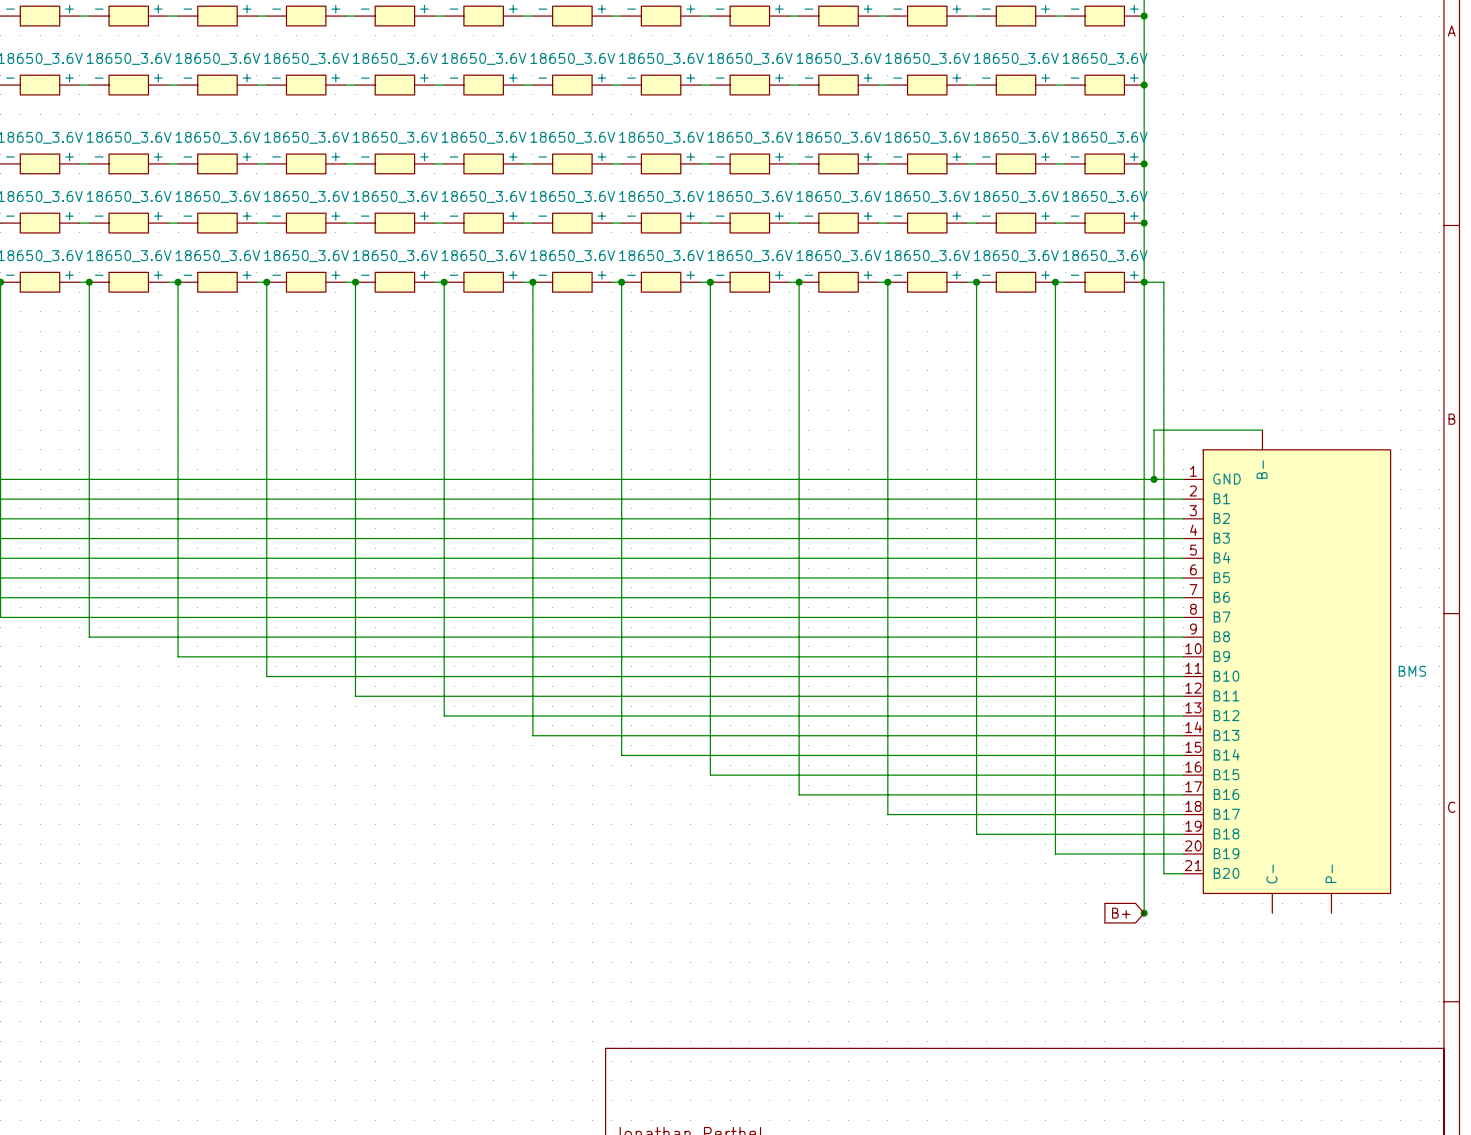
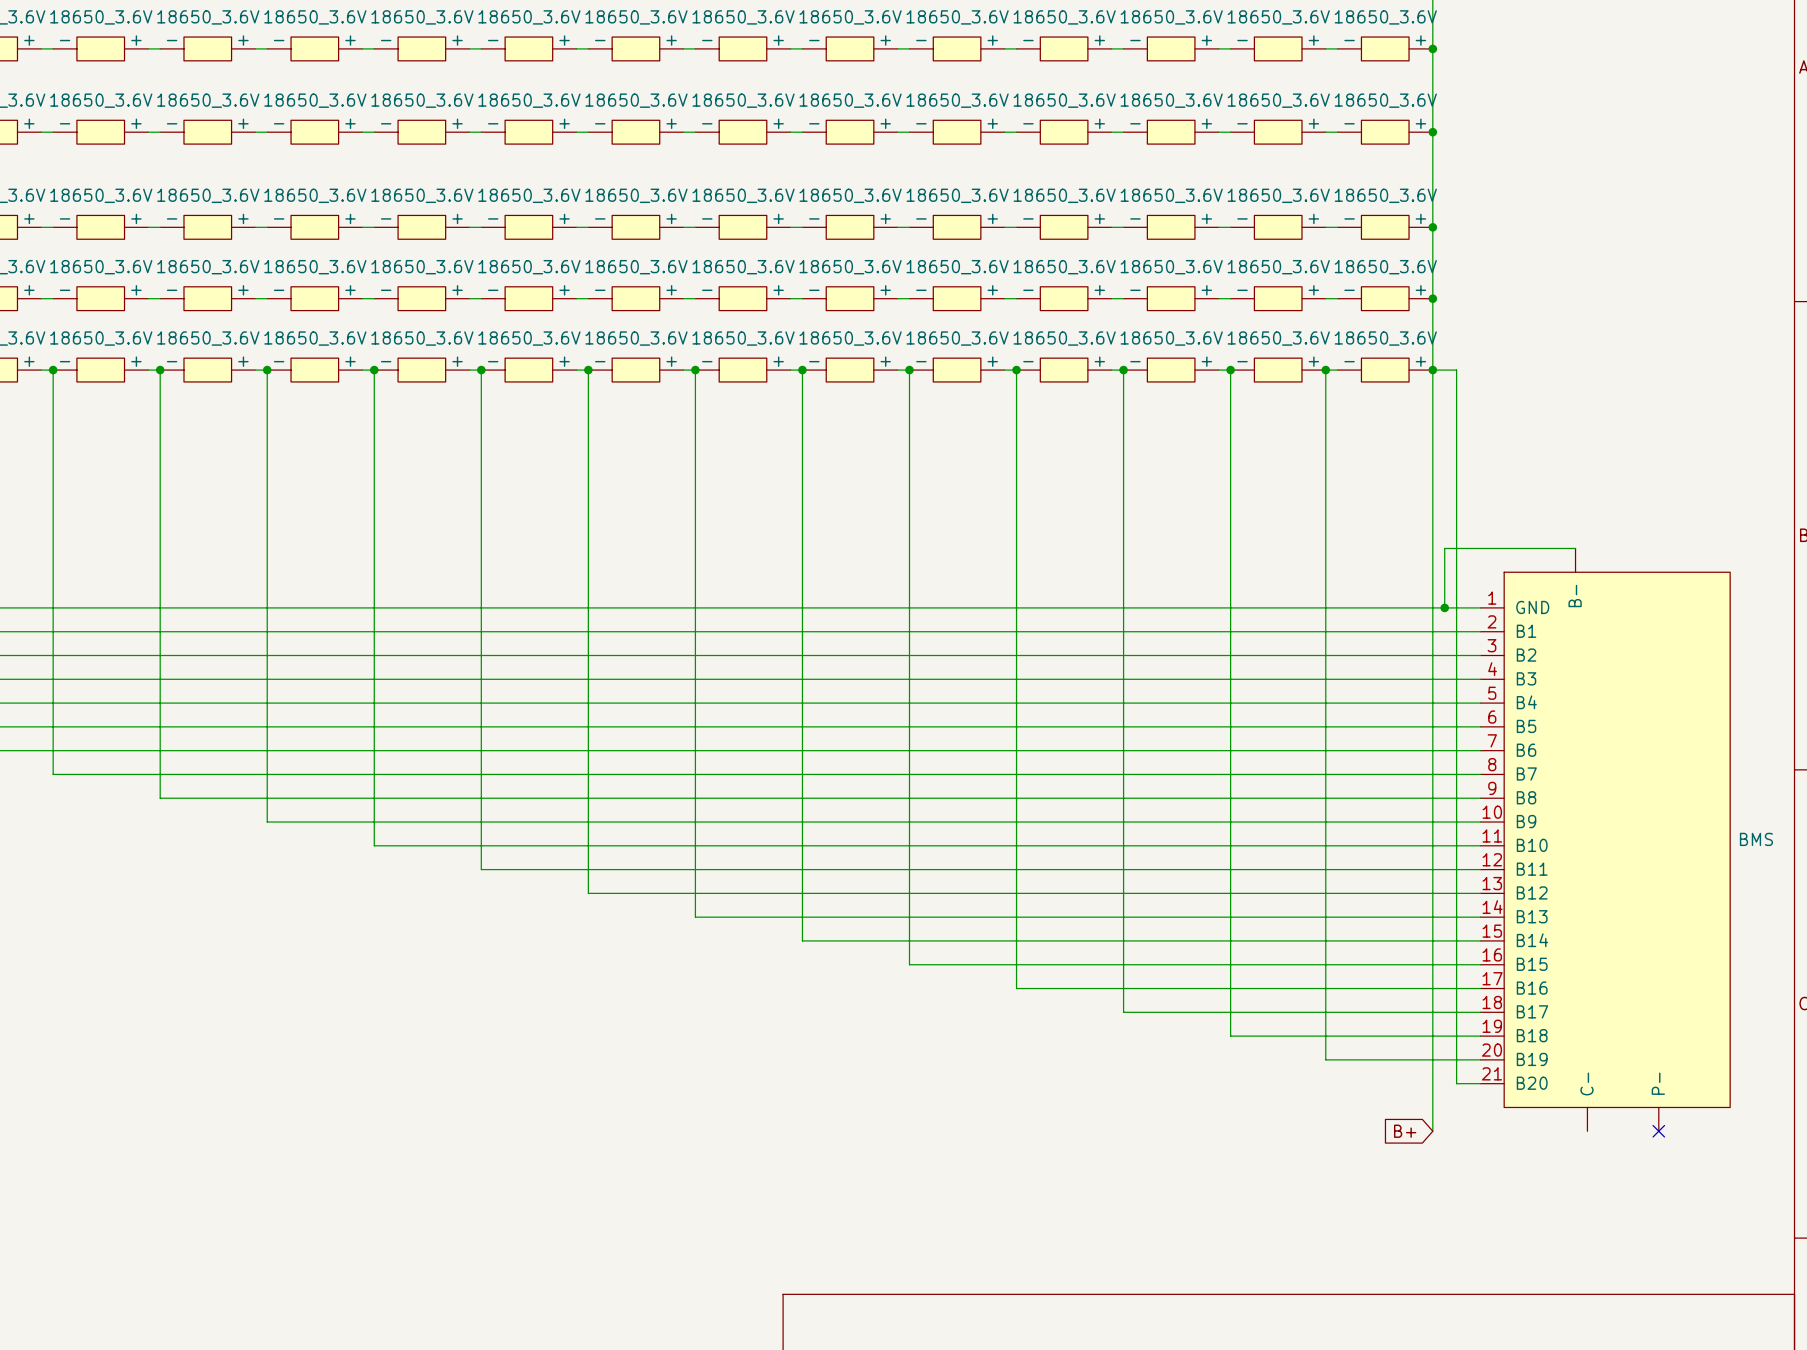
junction: (1144, 913) -> none
no-connect mark: none -> (1658, 1131)

